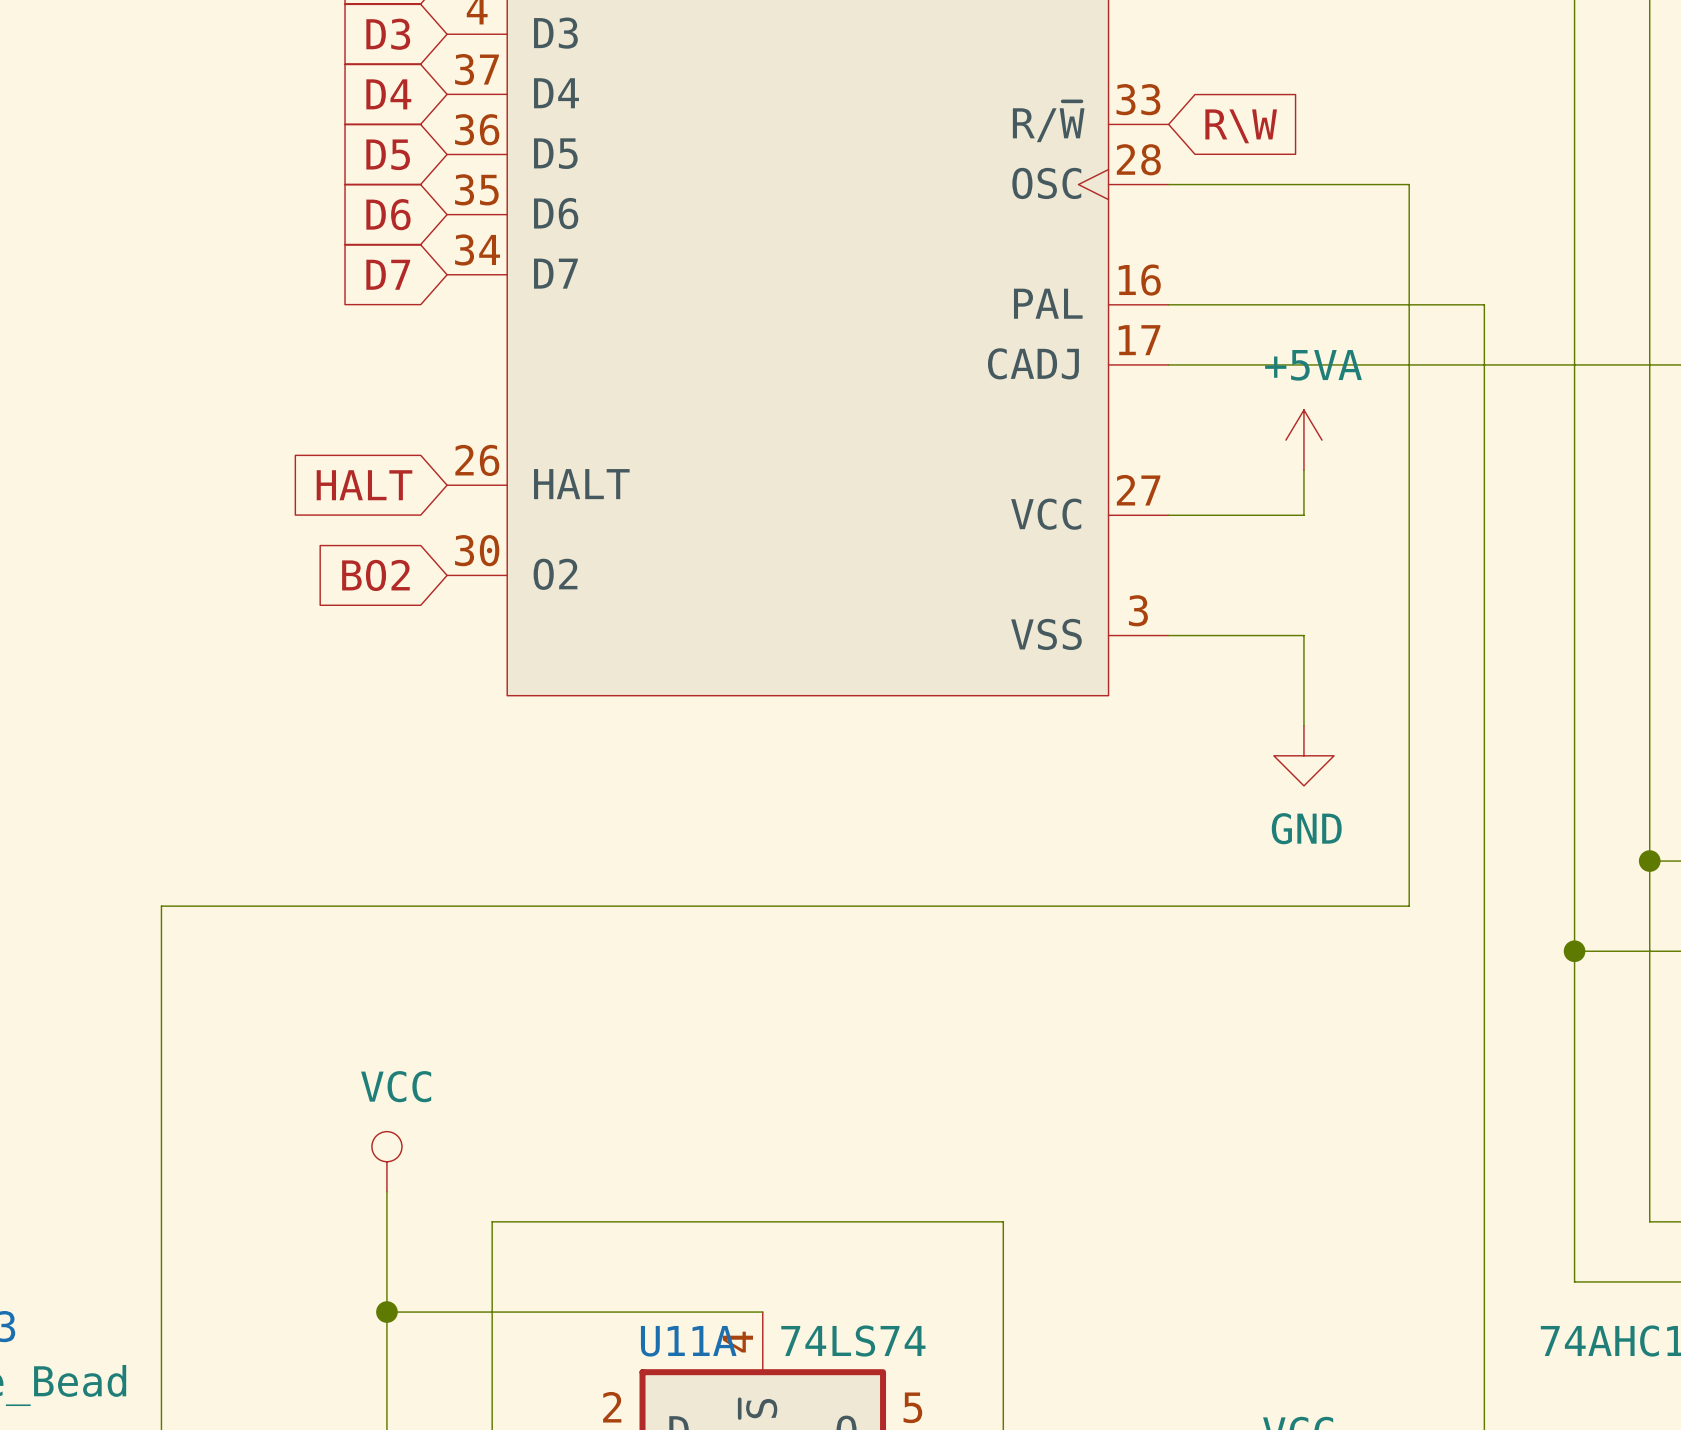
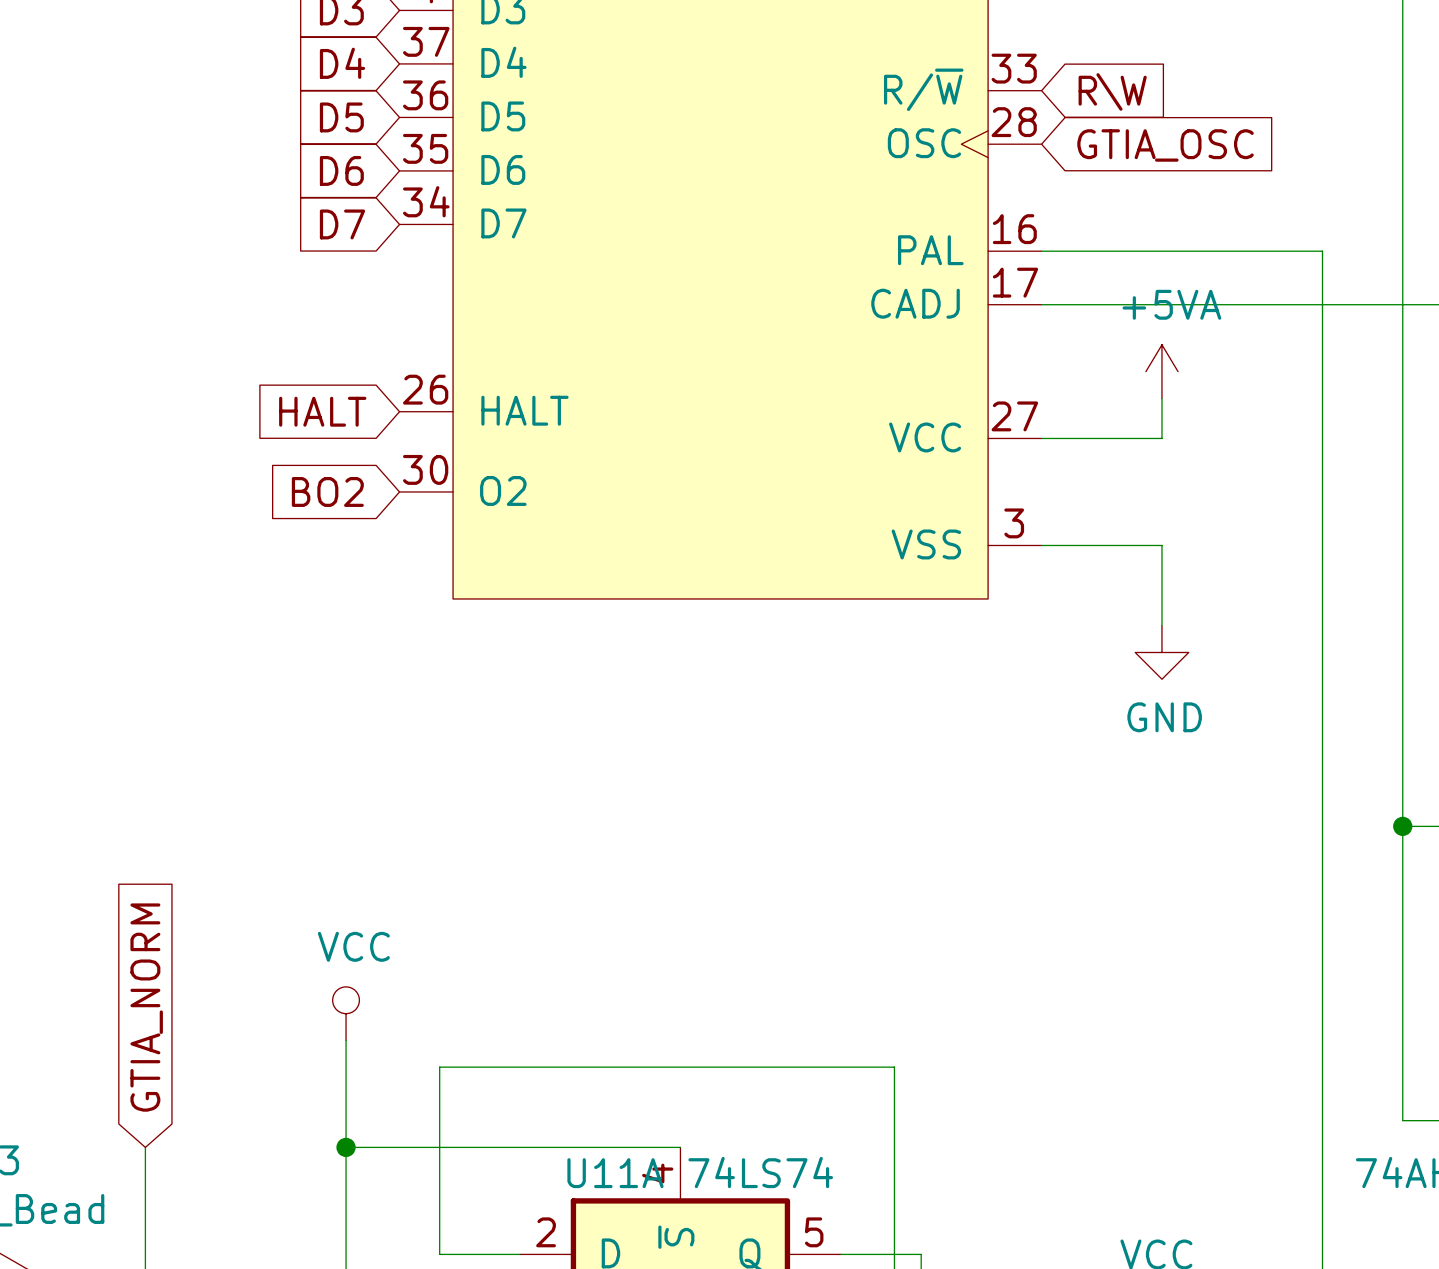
wire: (1168, 184) (1409, 184) (1409, 906) (161, 906) (161, 1312) -> none
global label: none -> GTIA_OSC (1165, 145)
global label: none -> GTIA_NORM (146, 1007)

